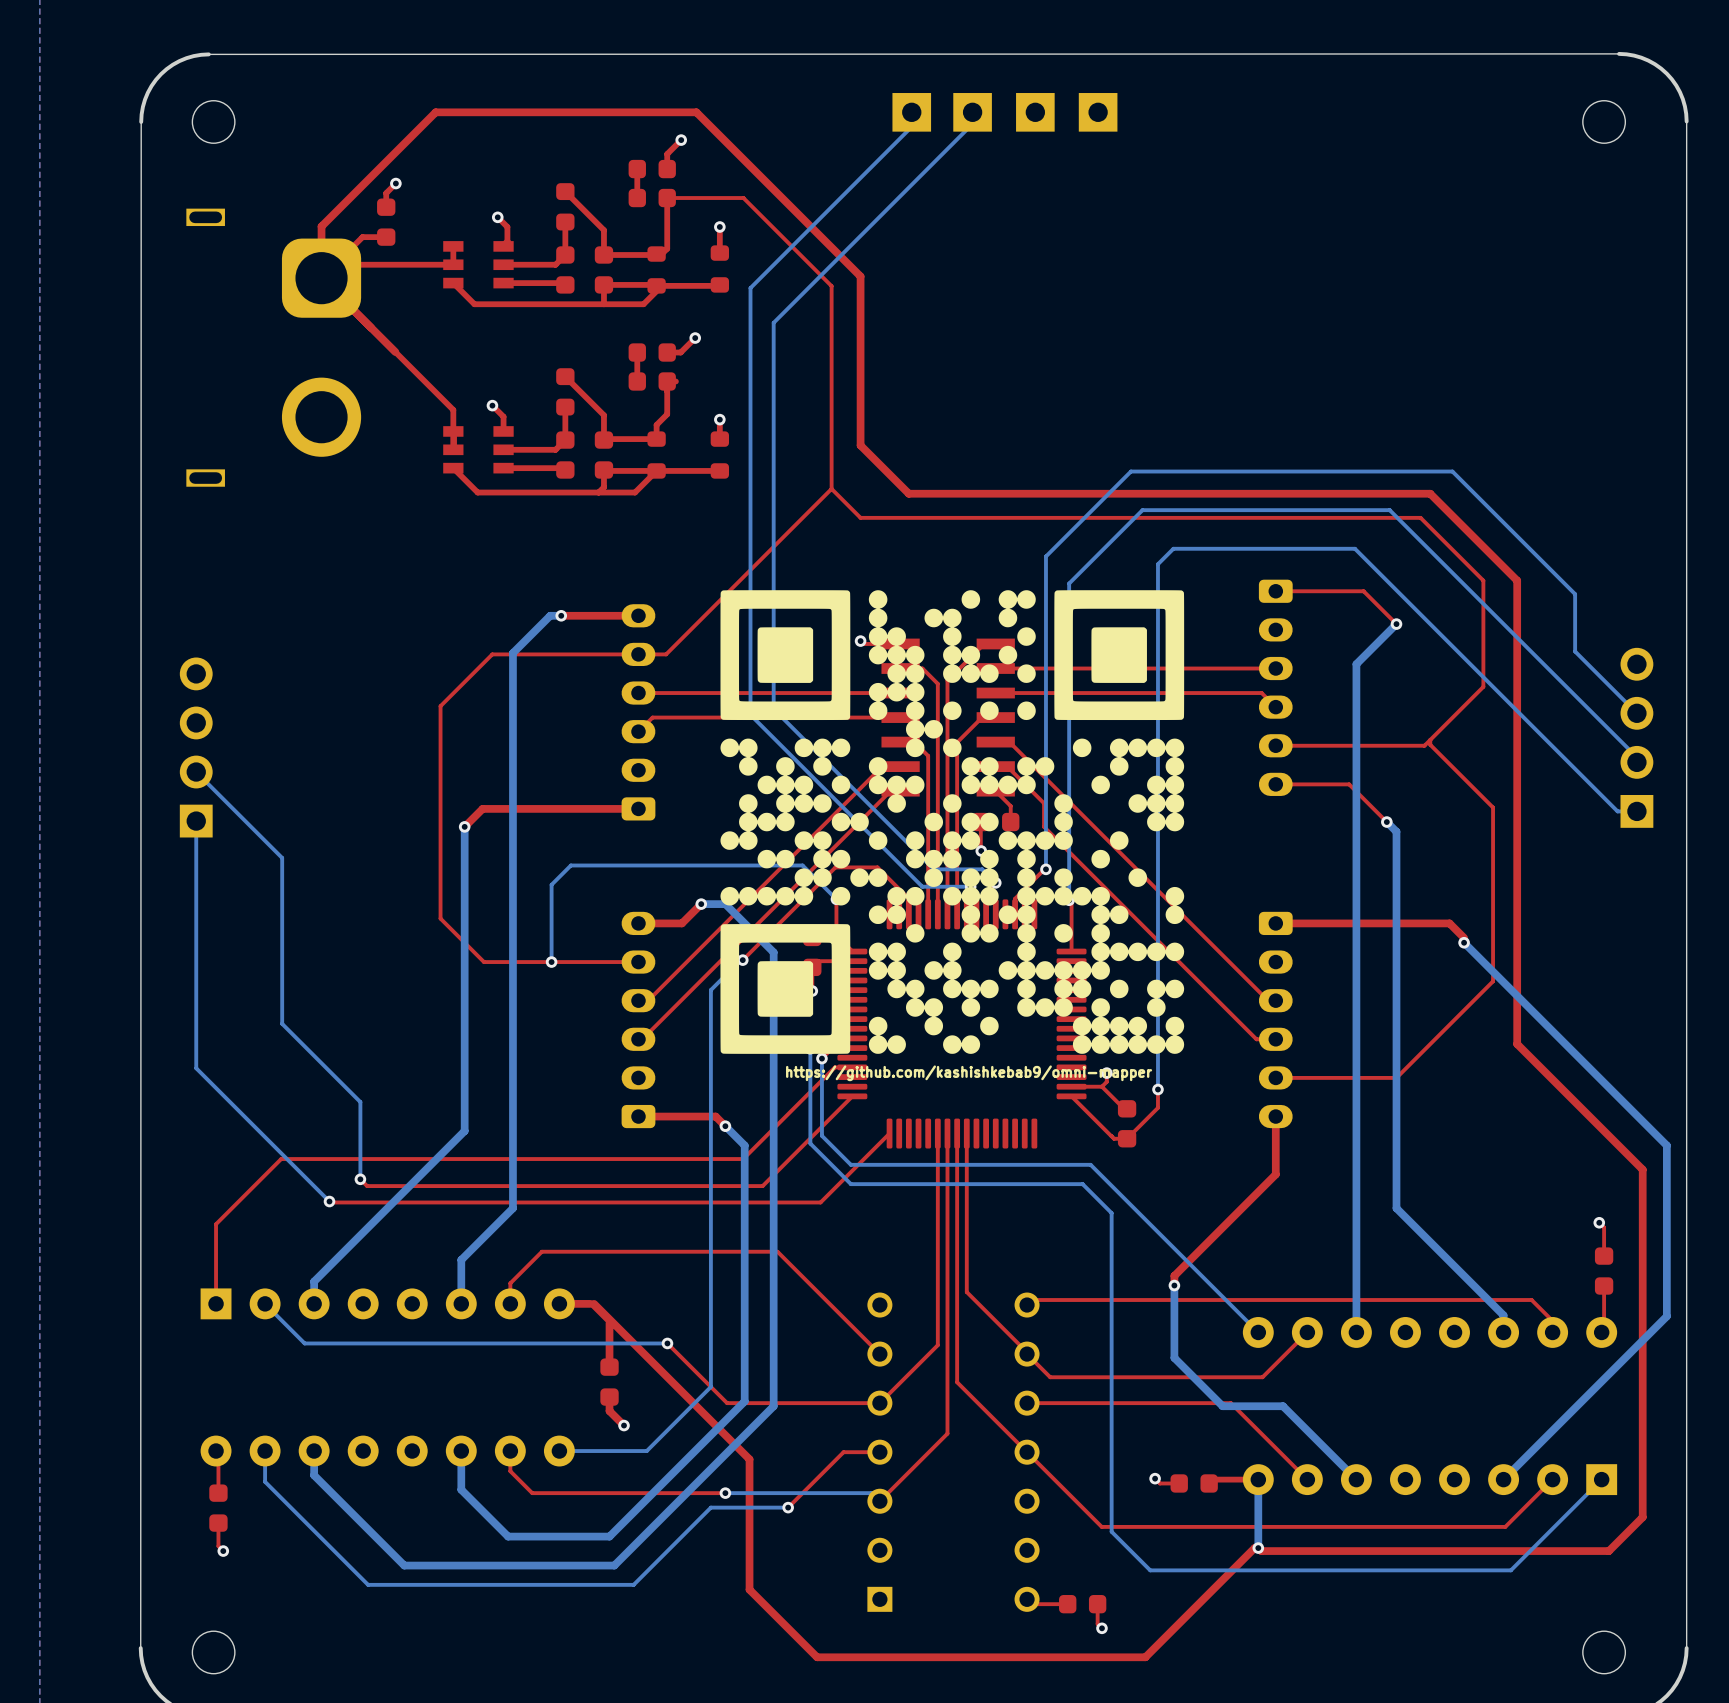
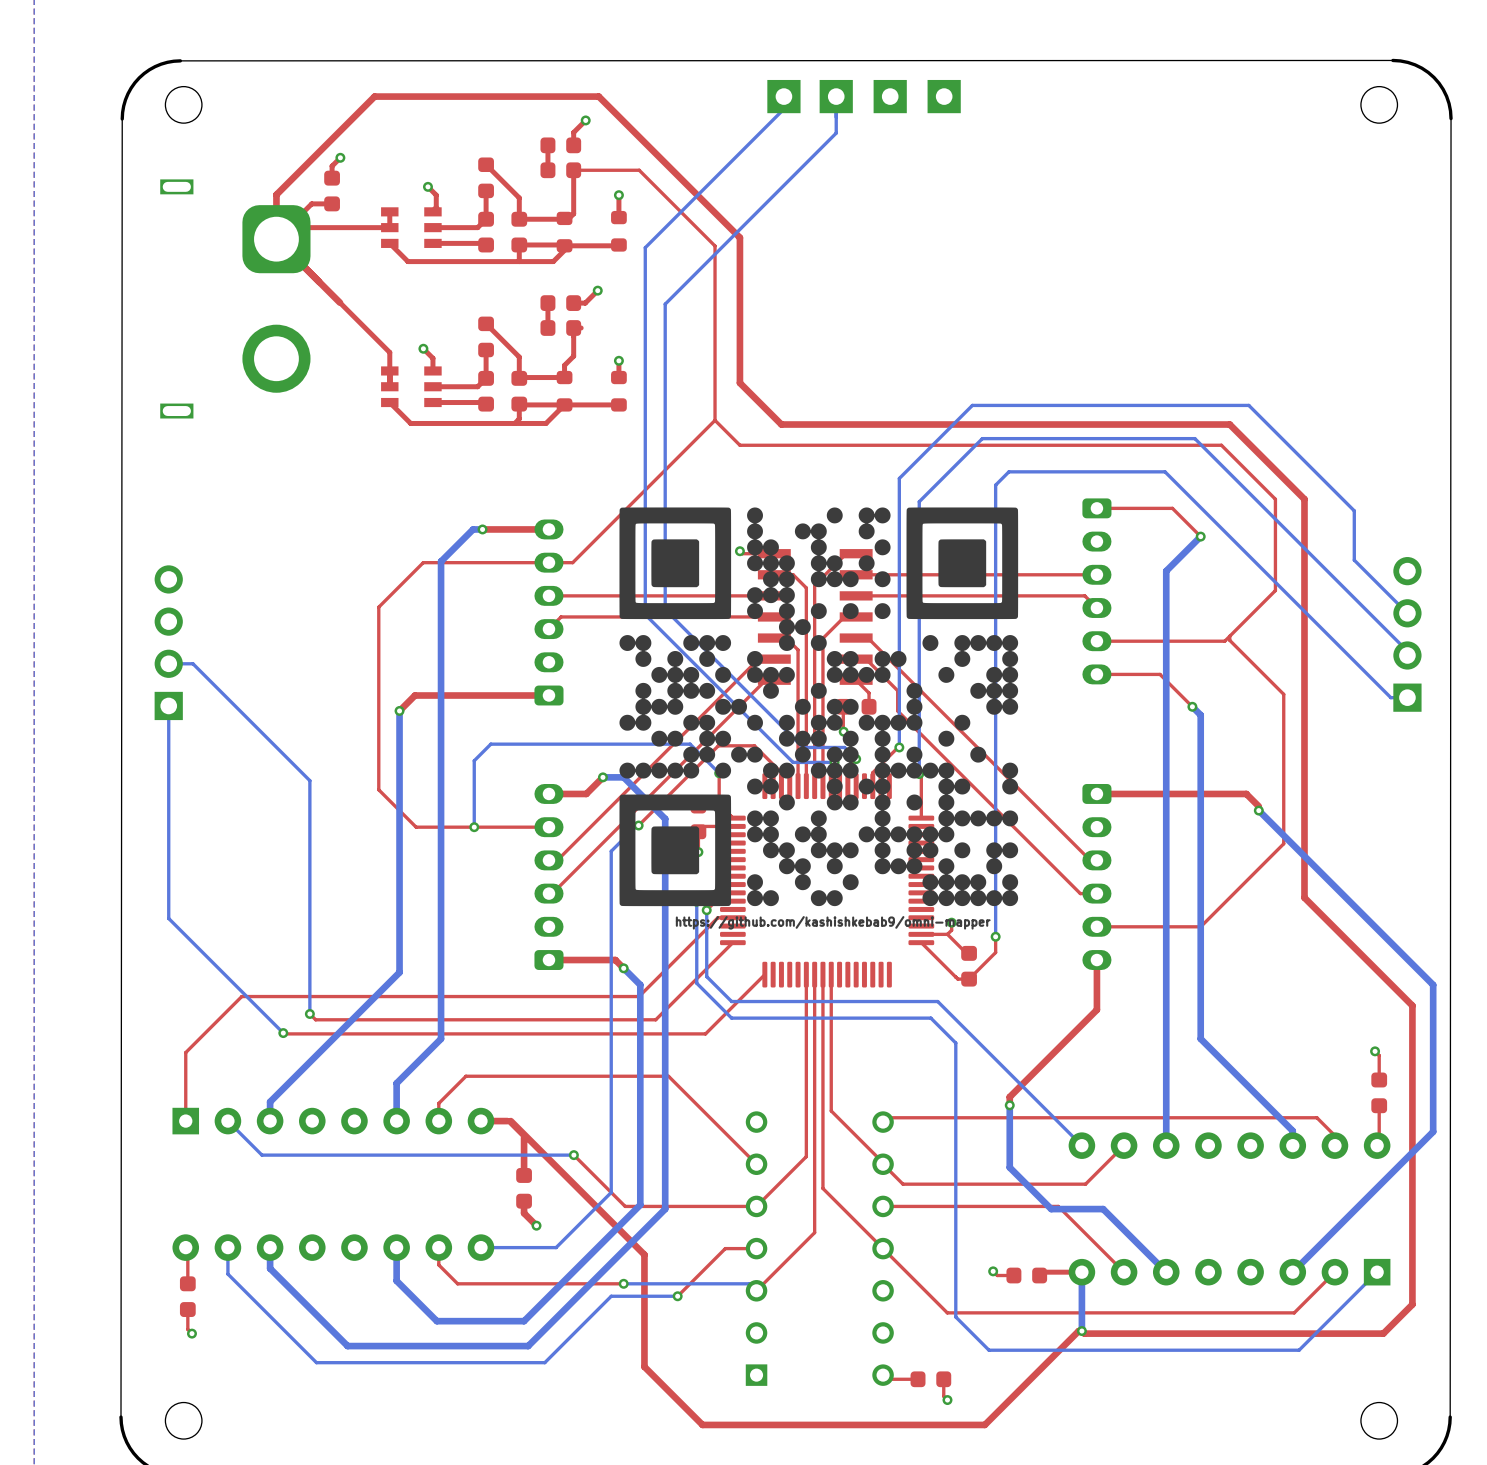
bottom track: (972, 112) (972, 123) (773, 322) (773, 353) -> (836, 106) (836, 133) (665, 304)
bottom track: (196, 772) (282, 857) (282, 1023) (360, 1102) -> (168, 663) (192, 663) (309, 780) (309, 947)
board edge: (1686, 1648) (1686, 121) (1682, 99) (1676, 85) (1666, 73) (1648, 60) (1634, 55) (1619, 53) (208, 54) (193, 56) (179, 61) (161, 74) (151, 86) (145, 99) (141, 121) (140, 1648) -> (1450, 1417) (1451, 118) (1446, 96) (1434, 77) (1415, 64) (1392, 60) (180, 60) (161, 64) (139, 77) (125, 99) (122, 118) (120, 1417)

